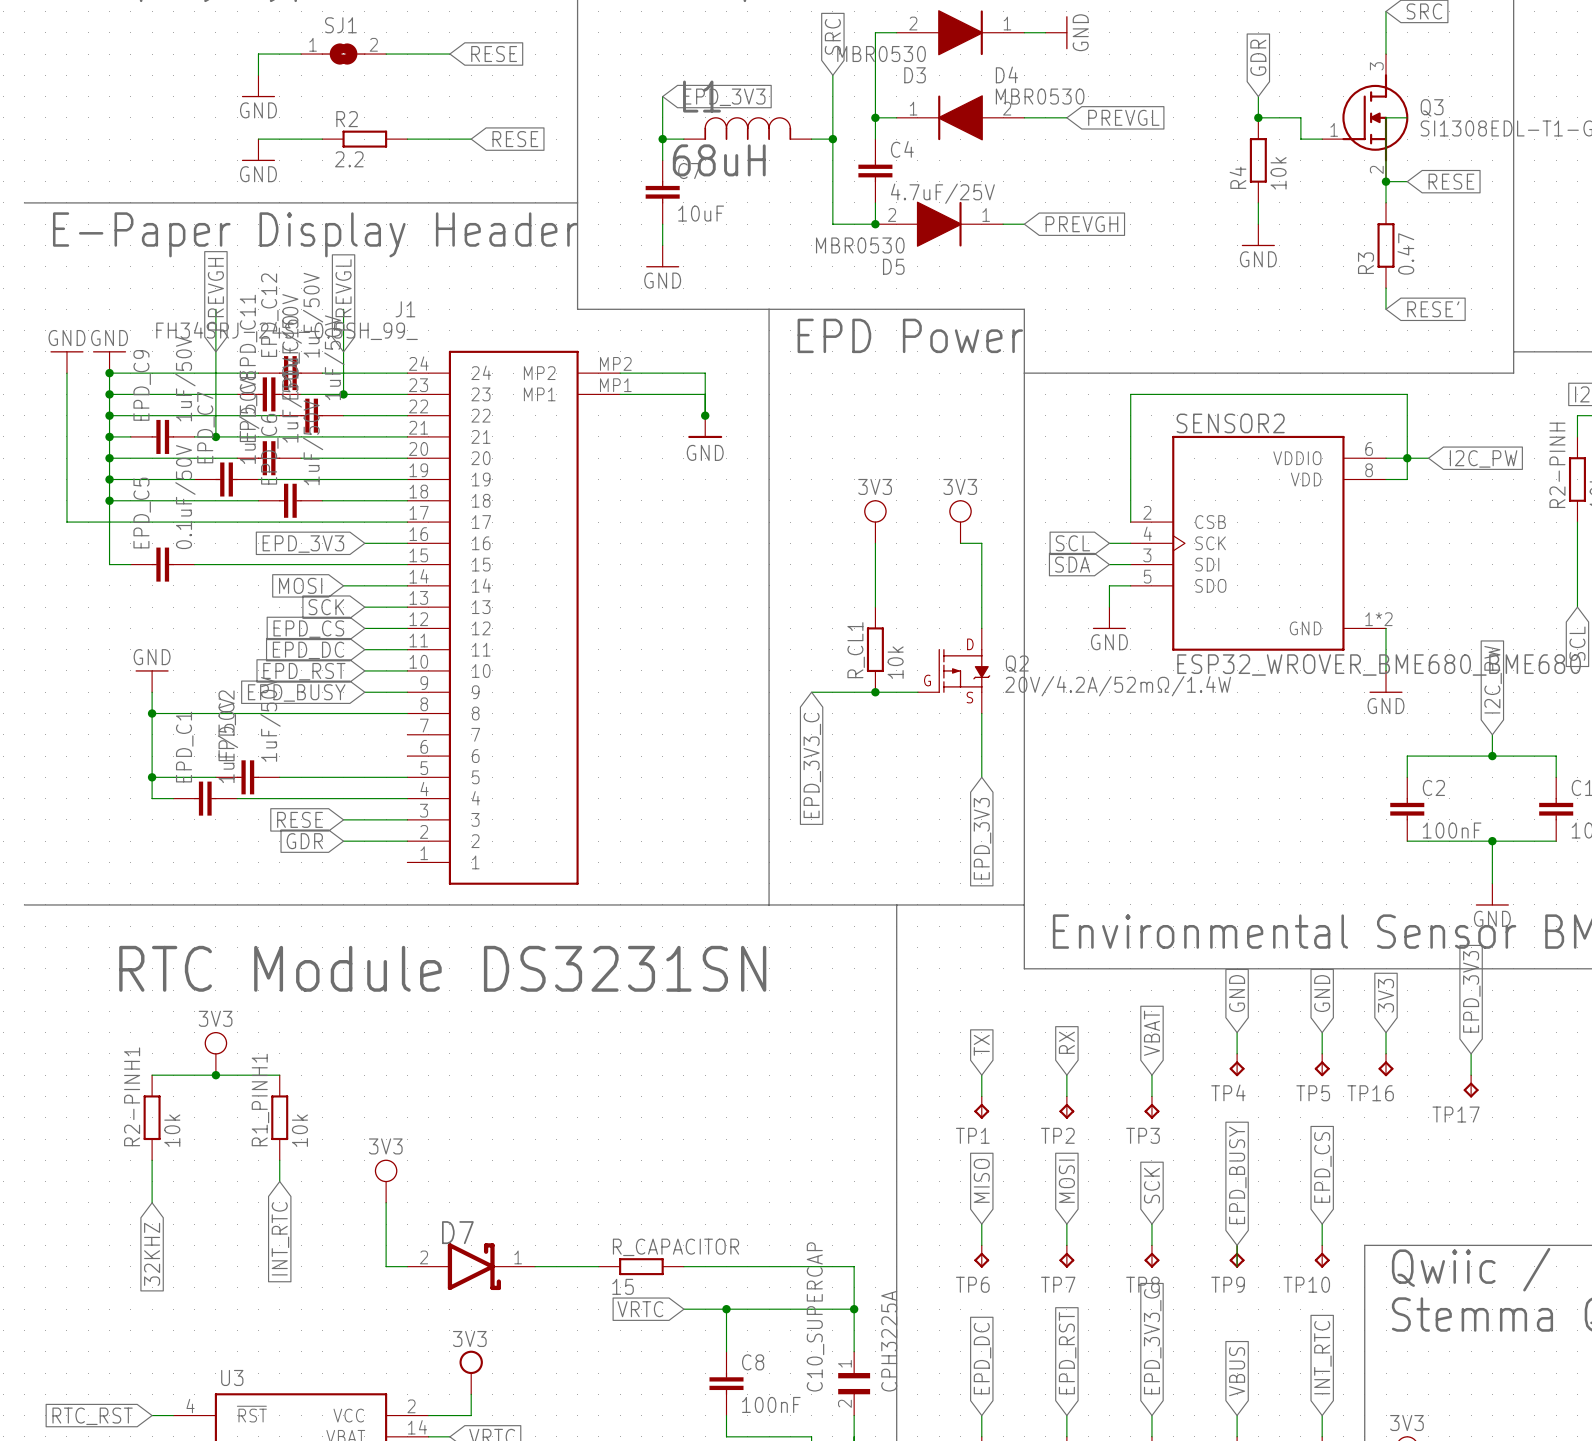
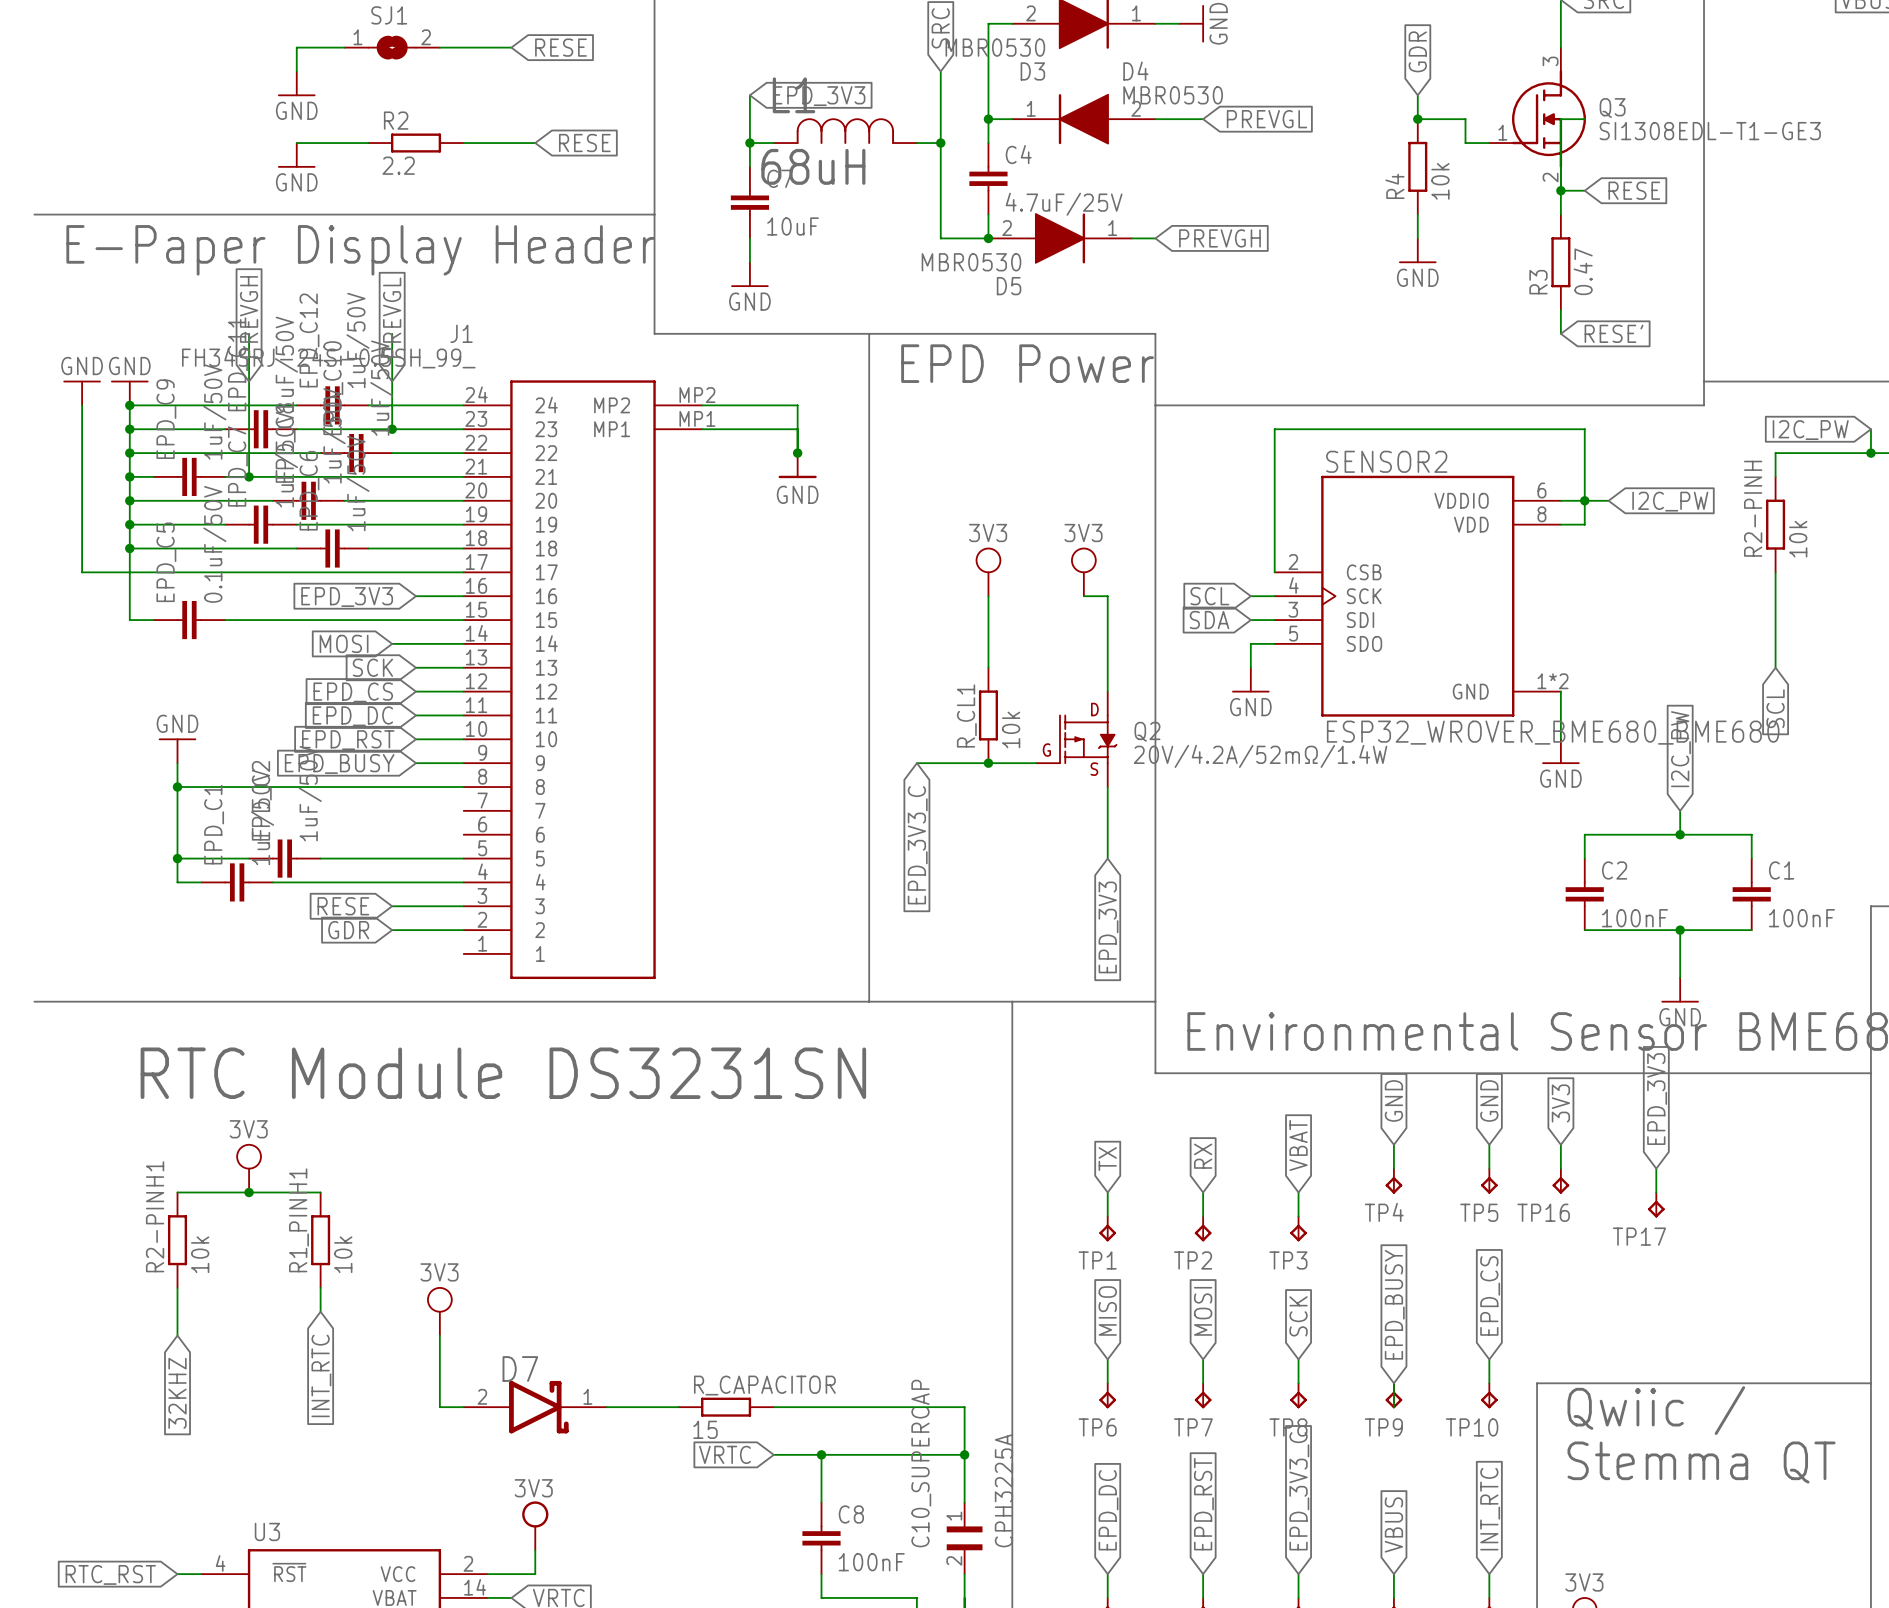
EPD_C11 position: (269, 394) -> (260, 429)

